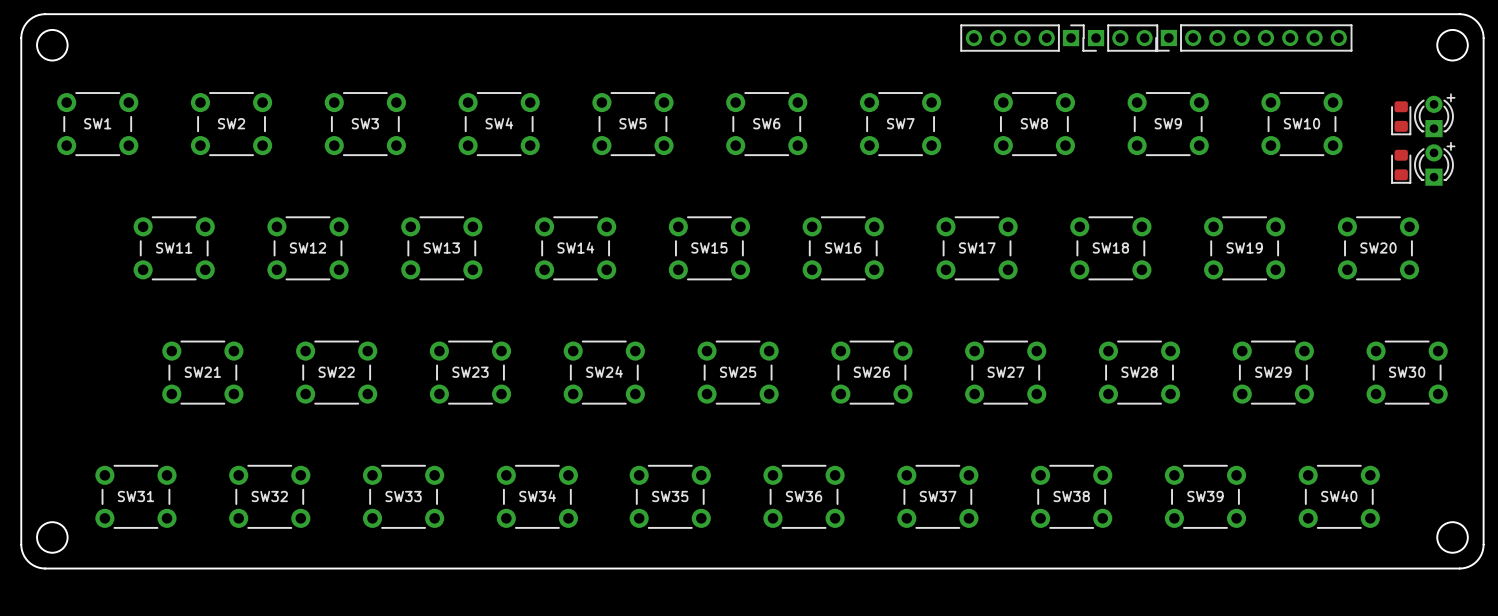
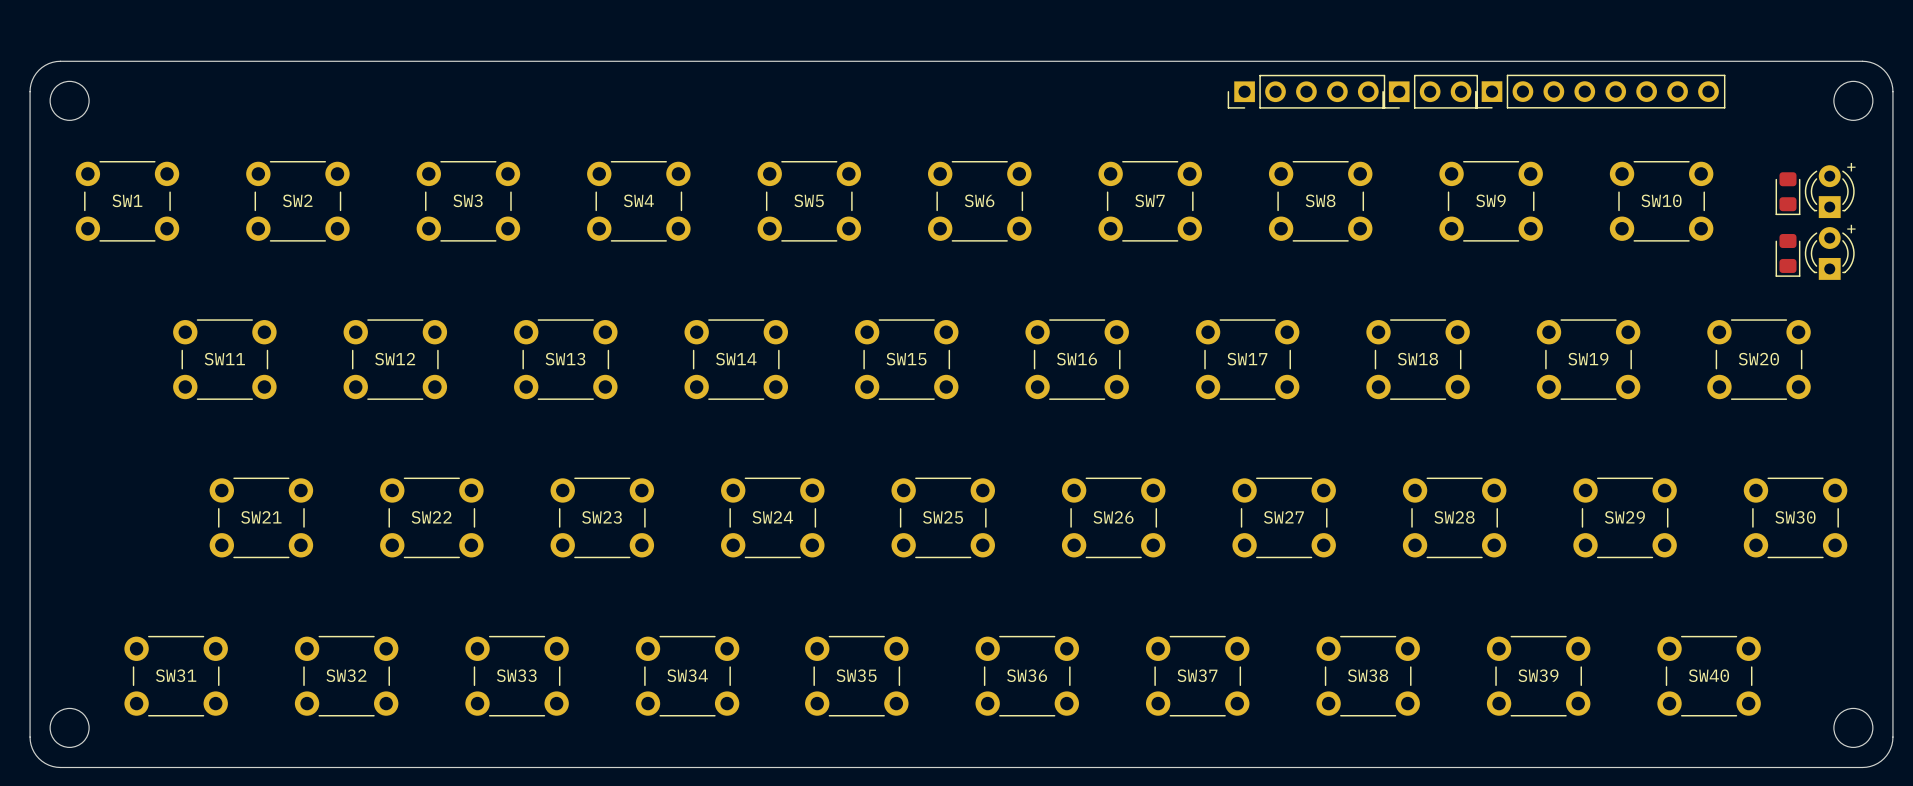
part rotation: 0° (1022, 38) -> 180° (1306, 91)

